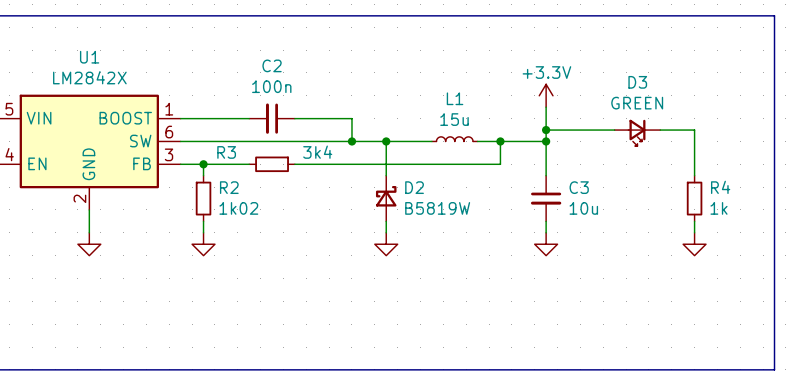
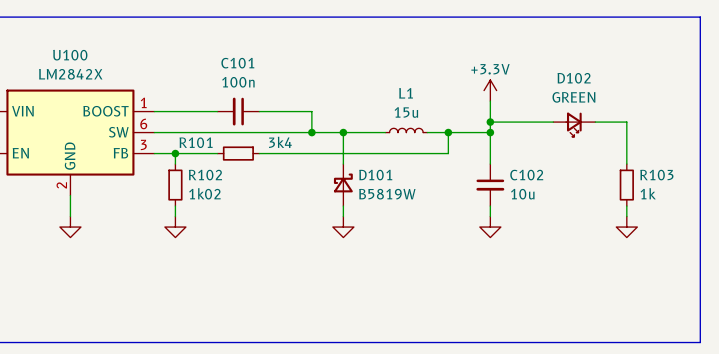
U1 name: U1 (89, 57) -> U100 (70, 55)
C2 name: C2 (272, 65) -> C101 (237, 63)
D3 name: D3 (637, 82) -> D102 (574, 78)
R3 name: R3 (226, 152) -> R101 (196, 142)
R2 name: R2 (229, 187) -> R102 (205, 175)
D2 name: D2 (414, 187) -> D101 (375, 175)
C3 name: C3 (579, 187) -> C102 (526, 175)
R4 name: R4 (720, 187) -> R103 (656, 175)

